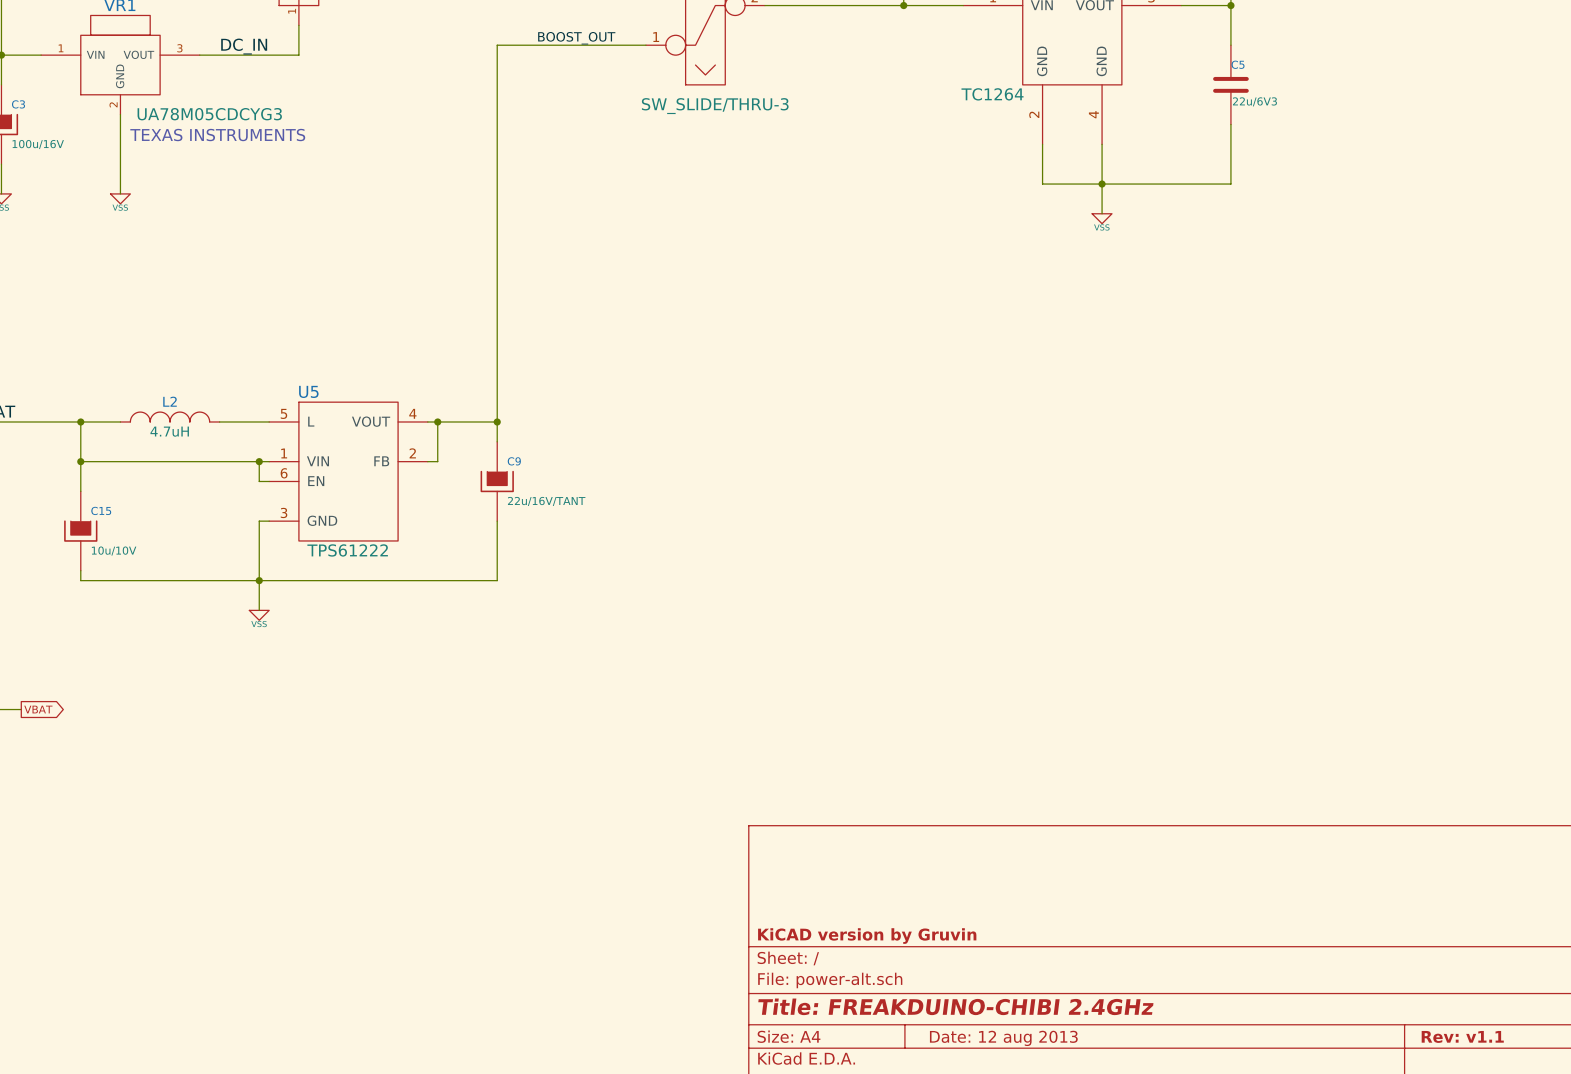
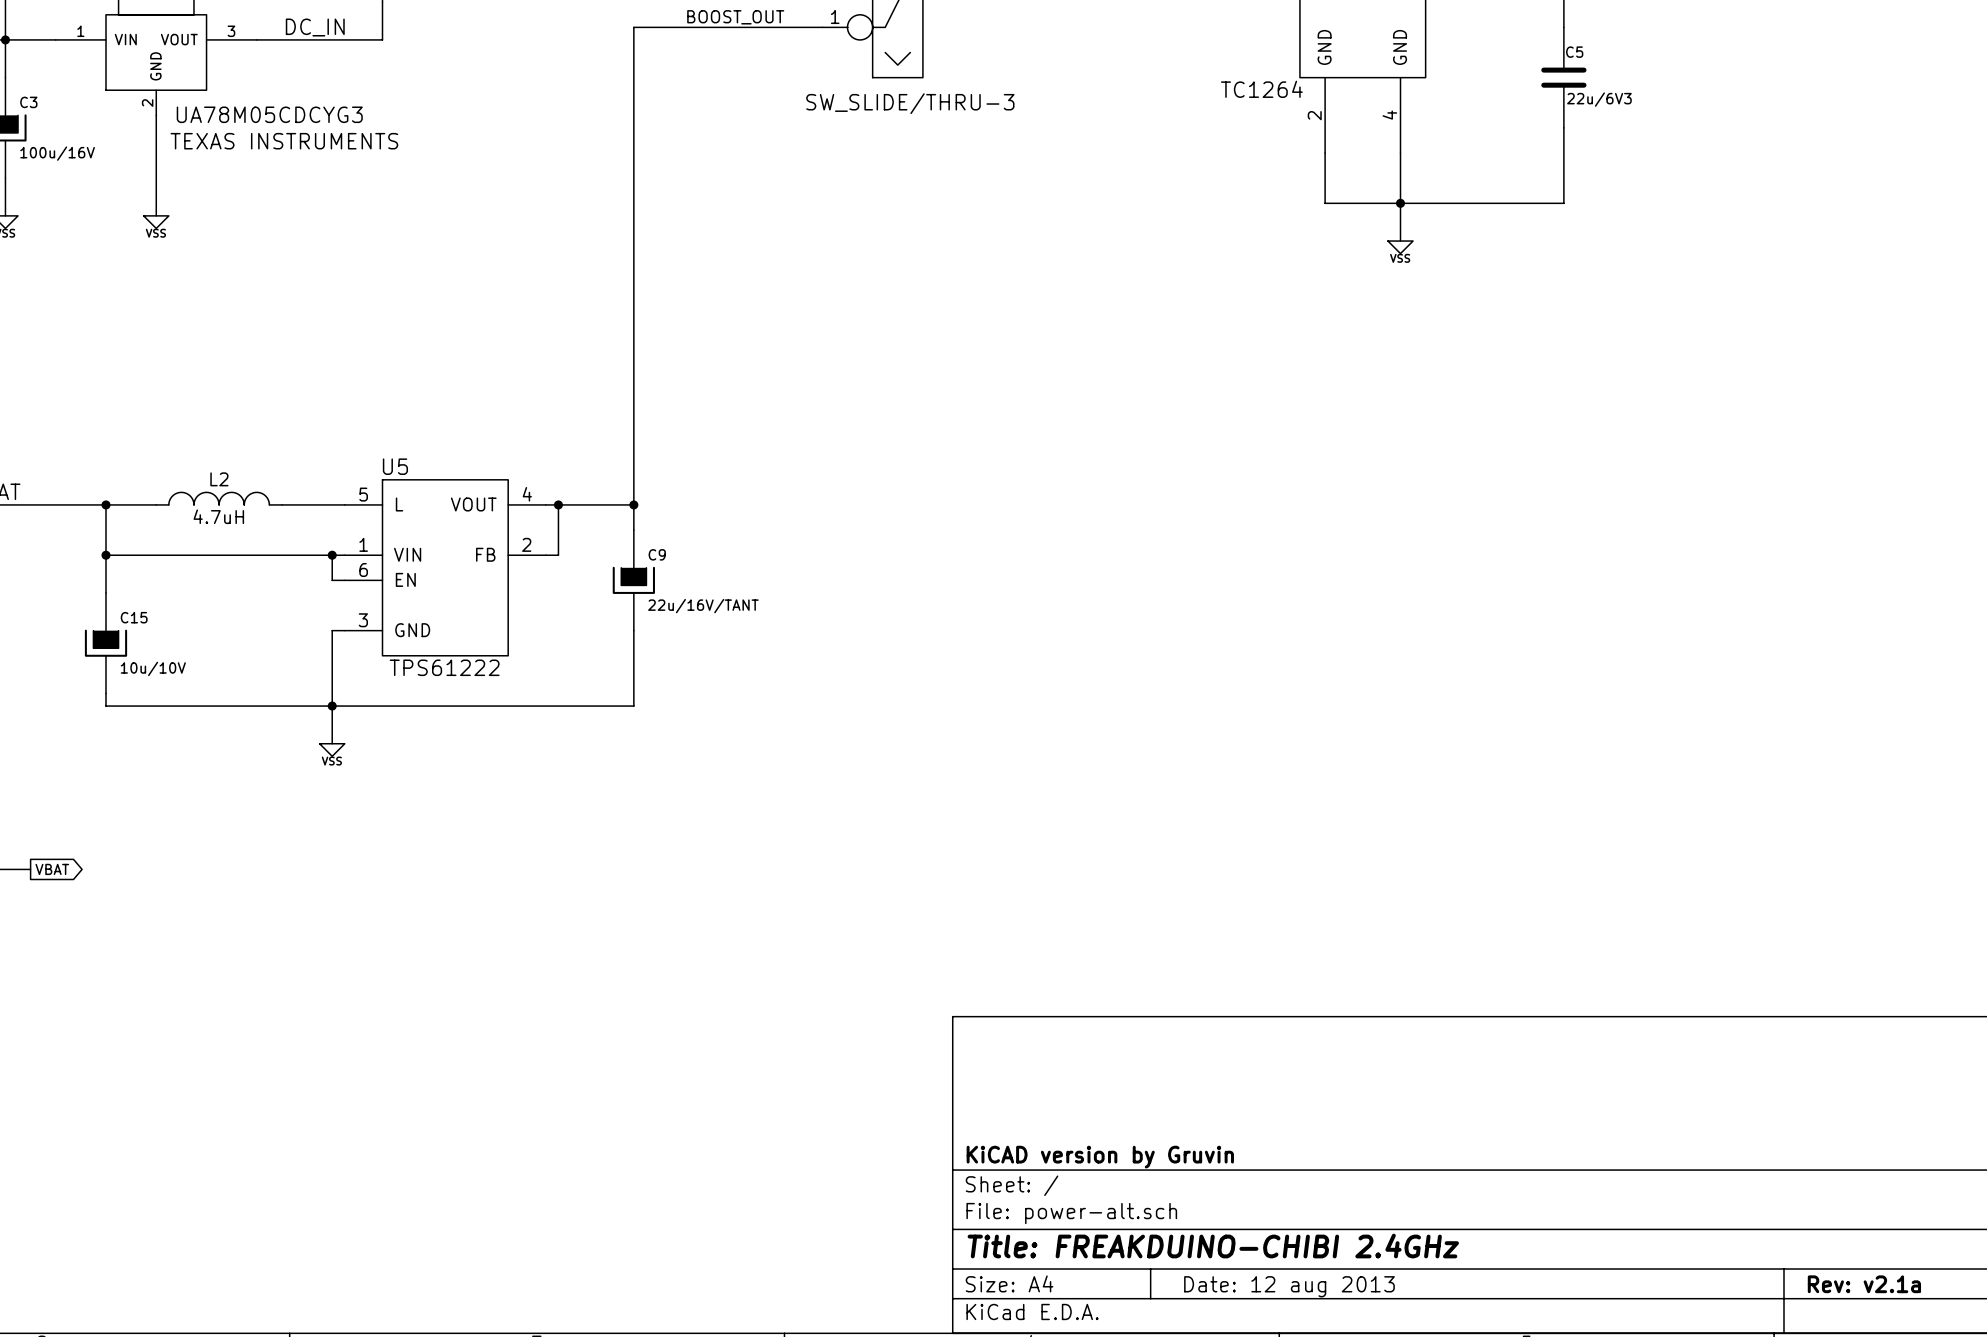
title block: Rev: v1.1 (1462, 1036) -> Rev: v2.1a (1864, 1284)

